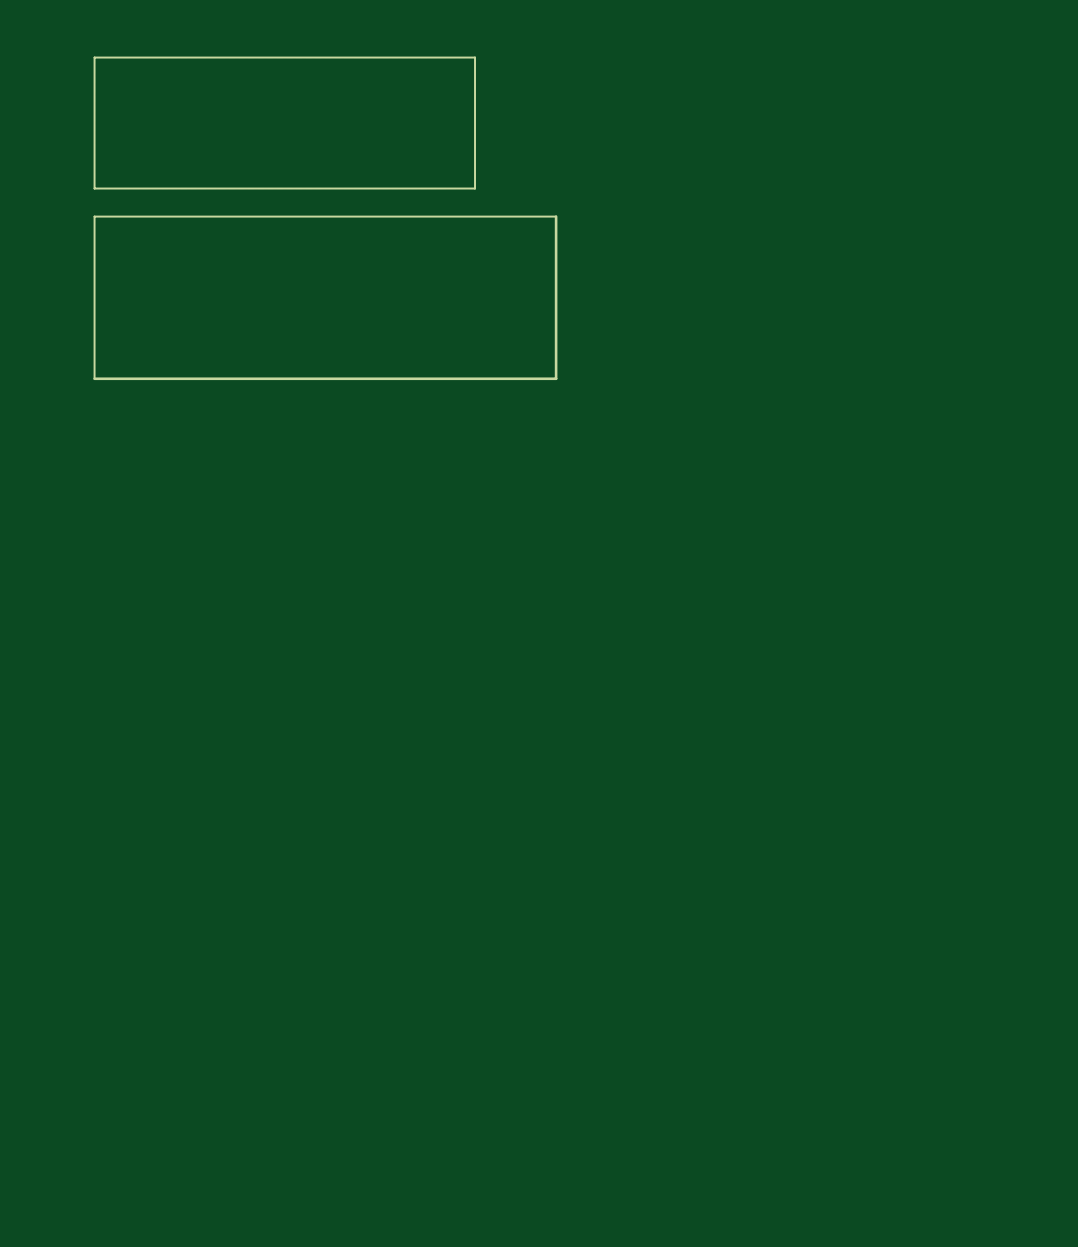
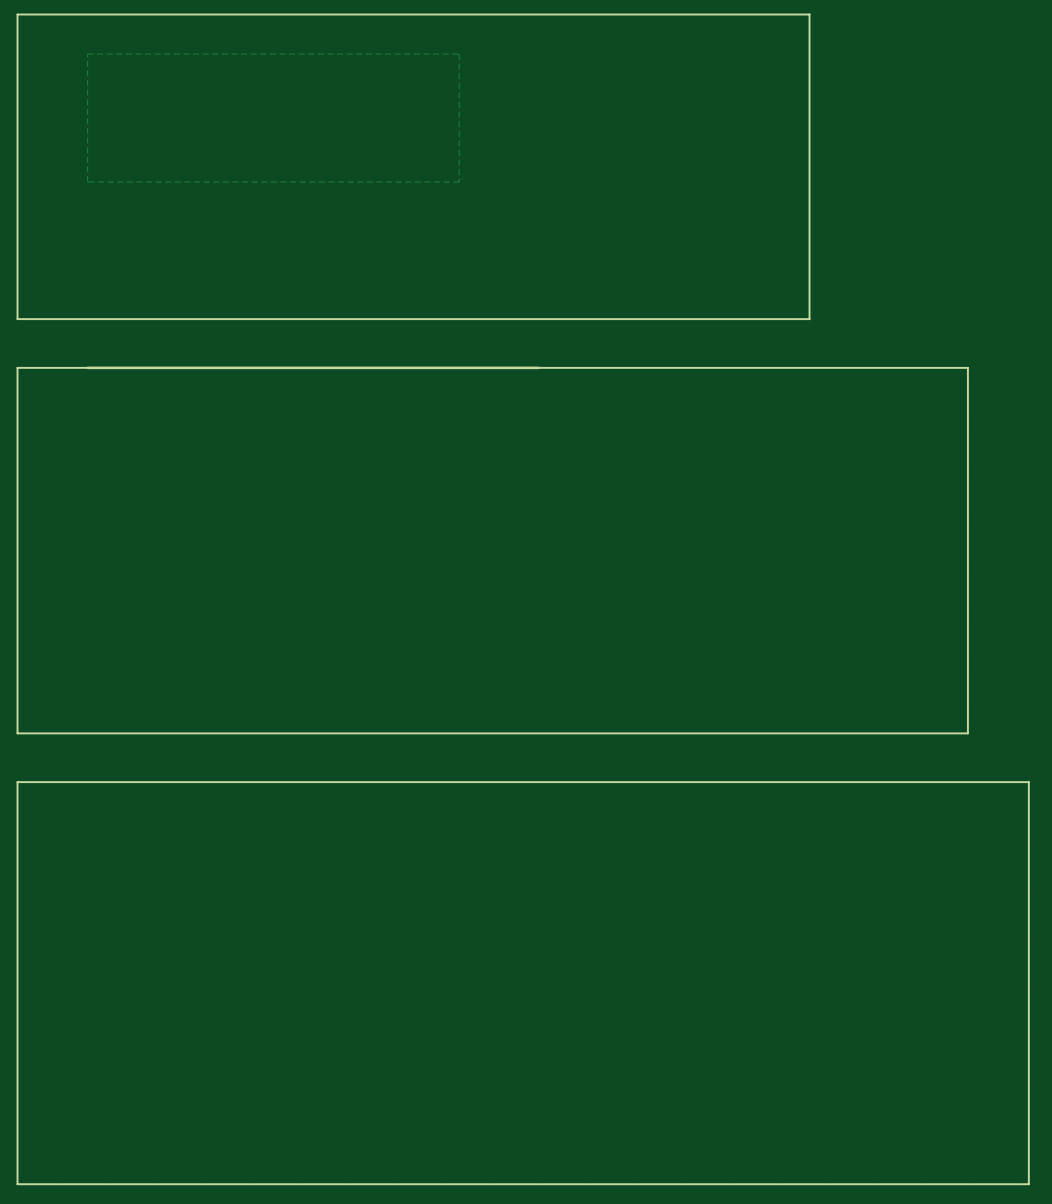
board edge: none -> (17, 14) (17, 319) (809, 319) (809, 14) (17, 14)
board edge: (94, 57) (94, 188) (475, 188) (475, 57) (94, 57) -> none
board edge: (94, 378) (94, 216) (556, 216) (556, 378) -> (87, 367) (17, 367) (17, 733) (967, 733) (967, 367) (538, 367)
board edge: none -> (17, 782) (17, 1184) (1028, 1184) (1028, 782) (17, 782)

